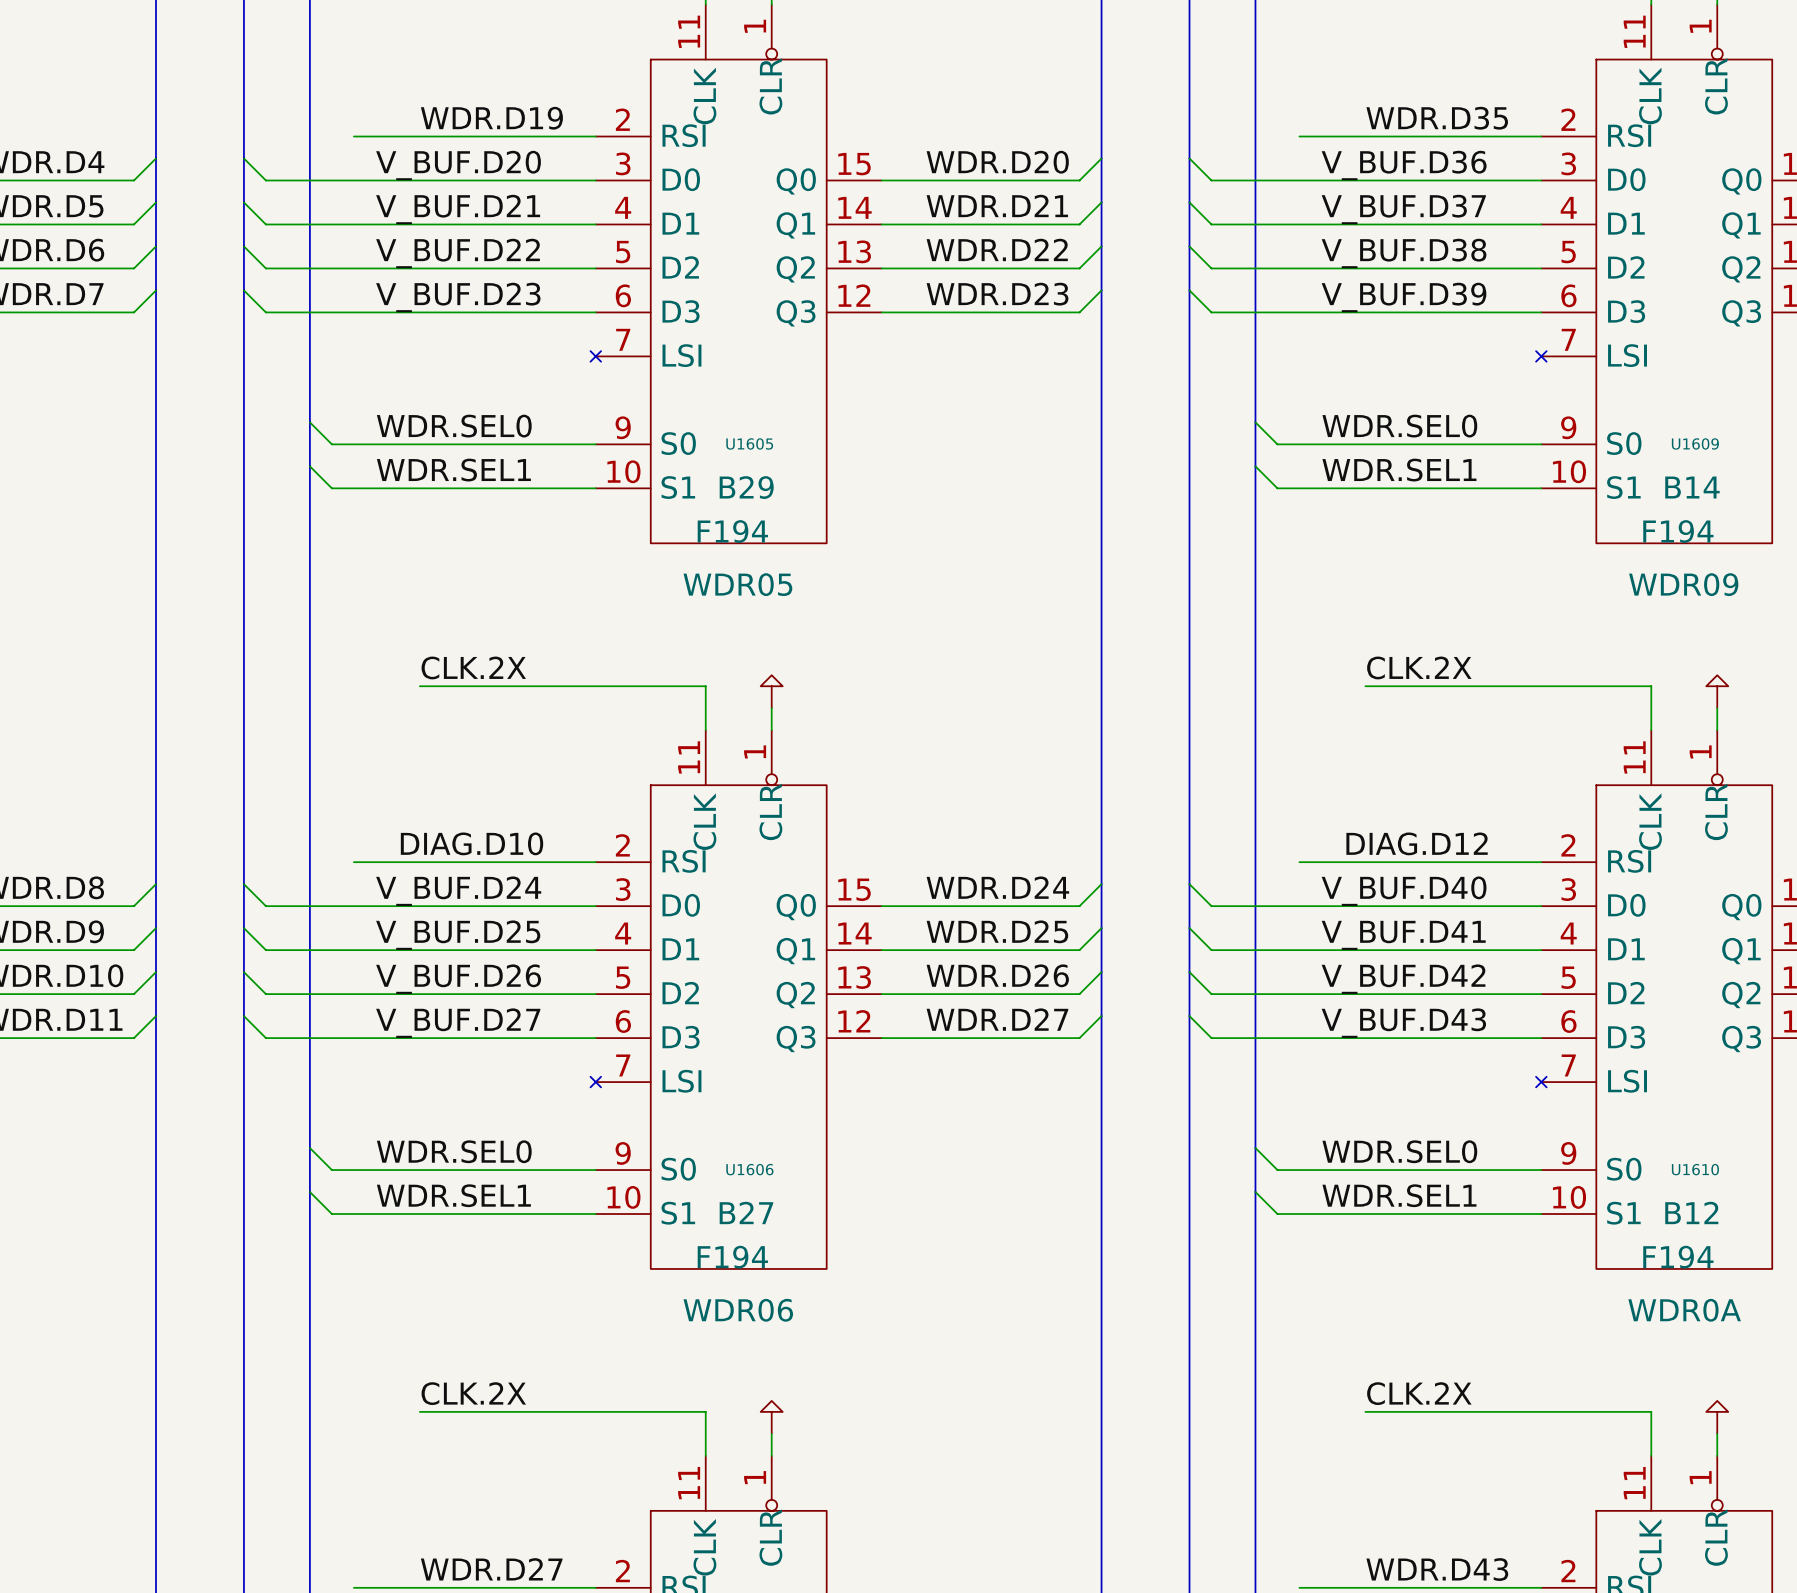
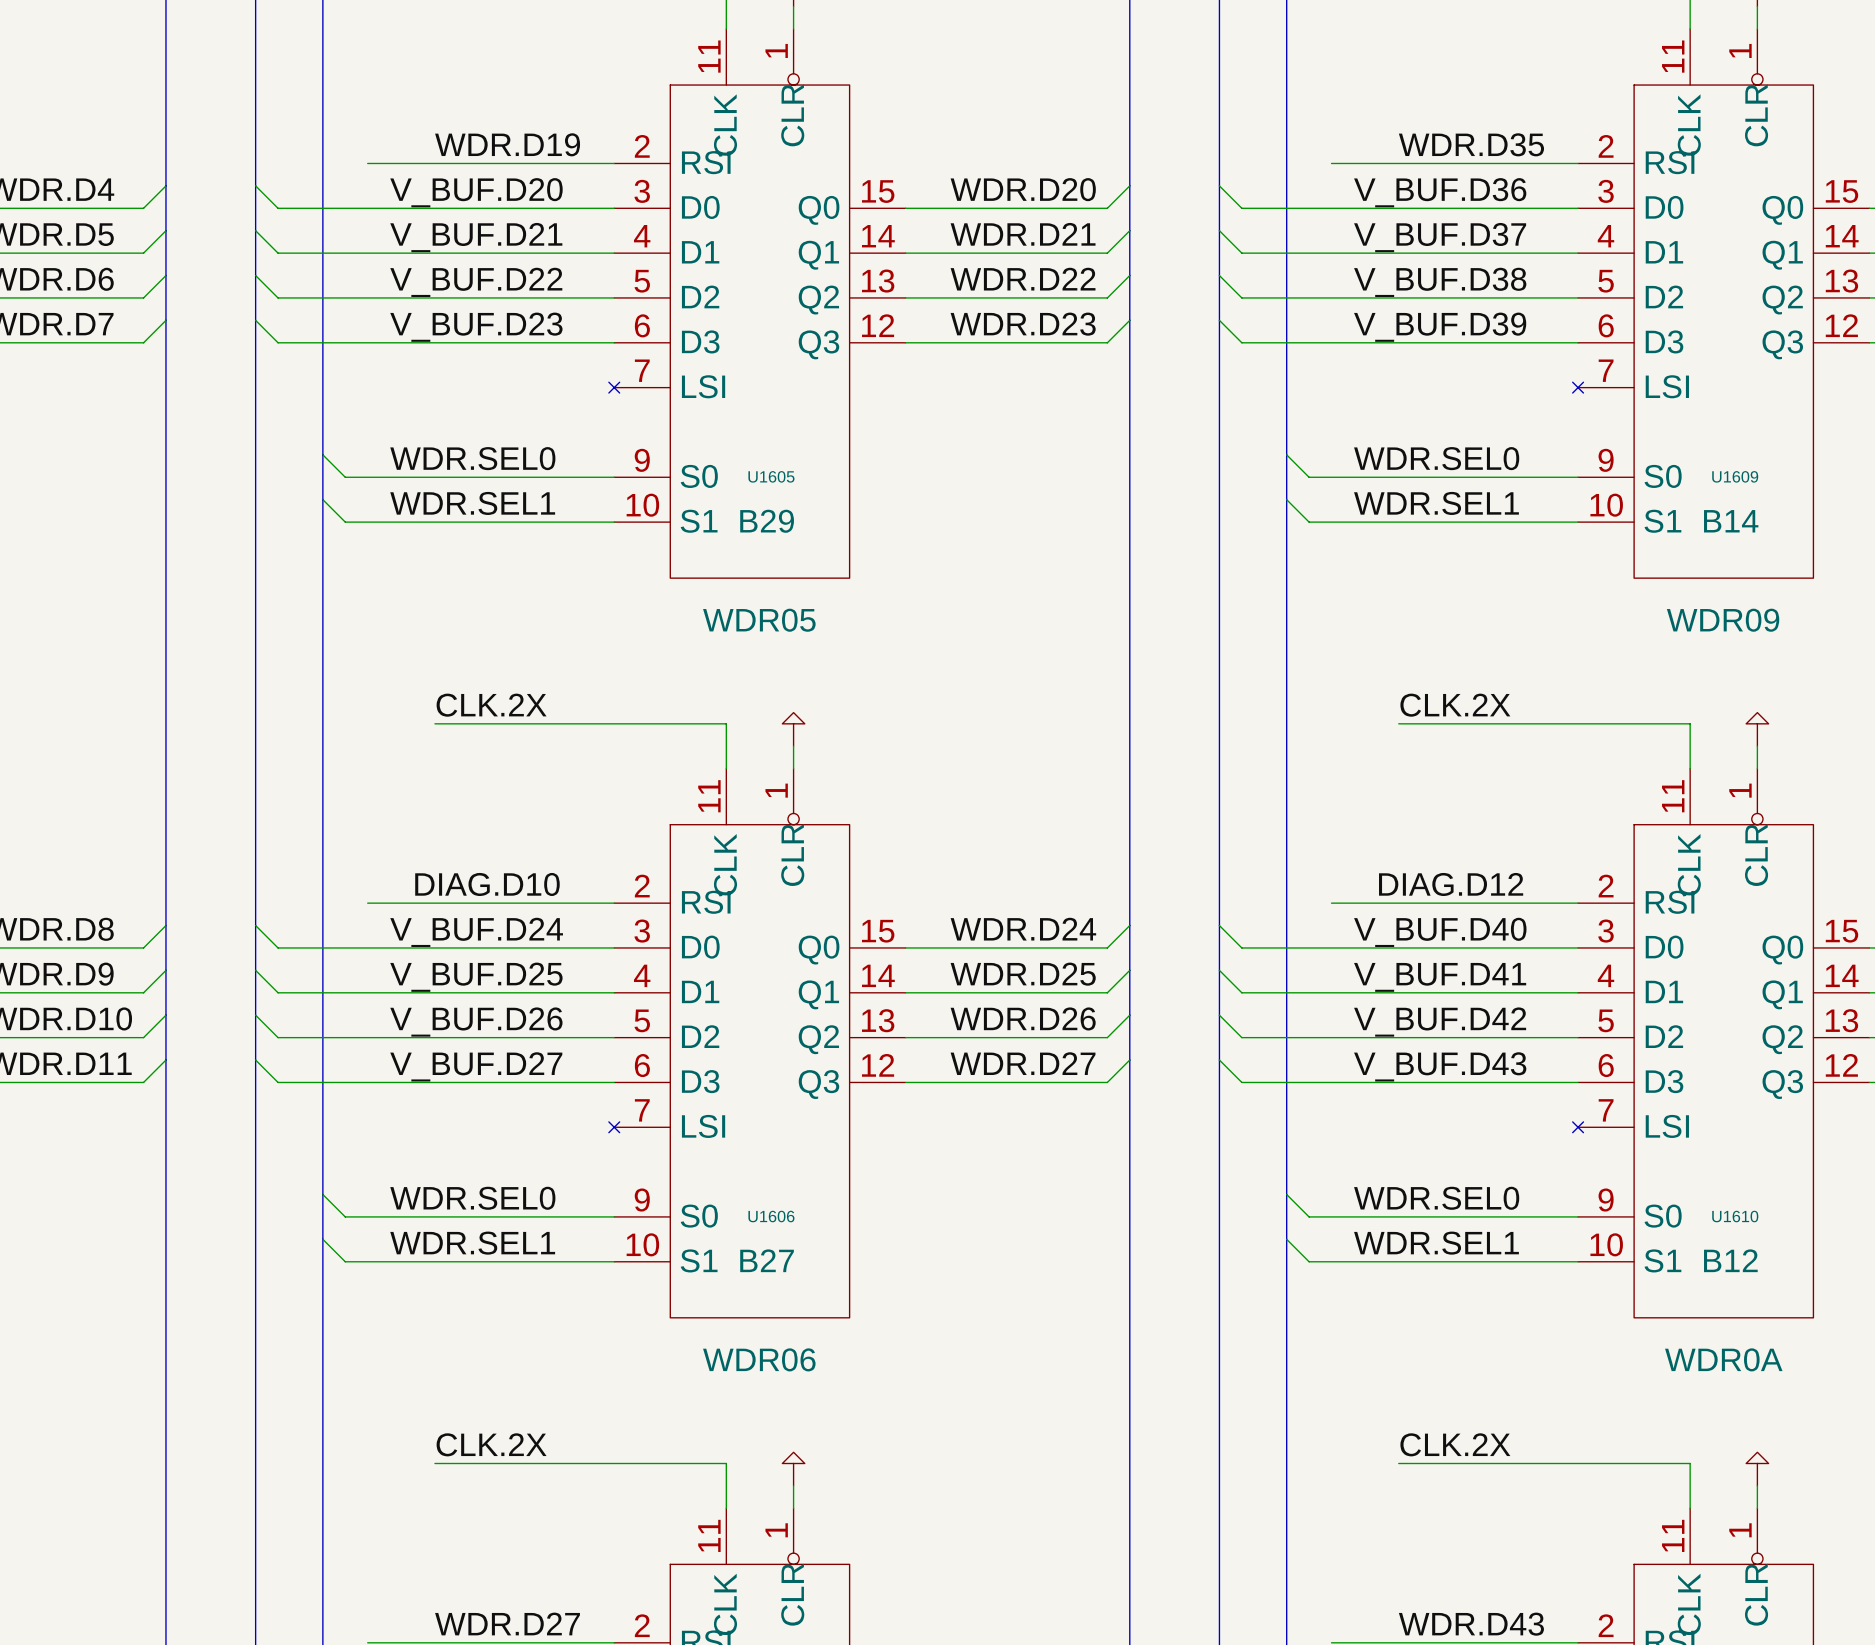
U1605 value: F194 (732, 531) -> none
U1609 value: F194 (1678, 531) -> none
U1606 value: F194 (732, 1257) -> none
U1610 value: F194 (1678, 1257) -> none

